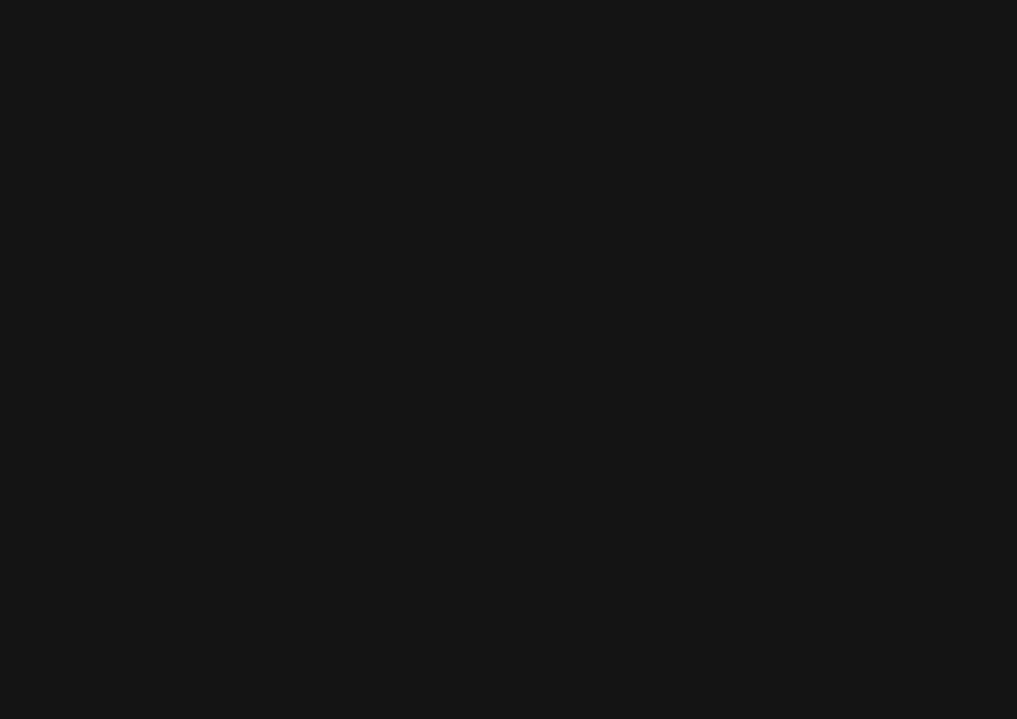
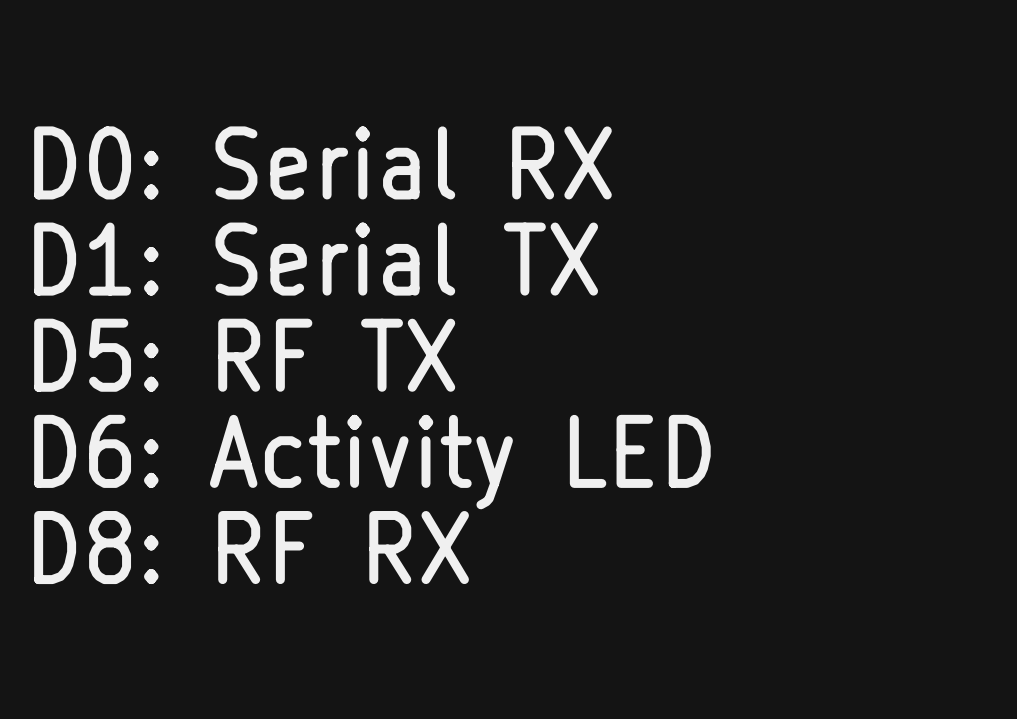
text: none -> D0: Serial RX (322, 162)
text: none -> D1: Serial TX (316, 259)
text: none -> D5: RF TX (244, 355)
text: none -> D6: Activity LED (372, 462)
text: none -> D8: RF RX (251, 547)

